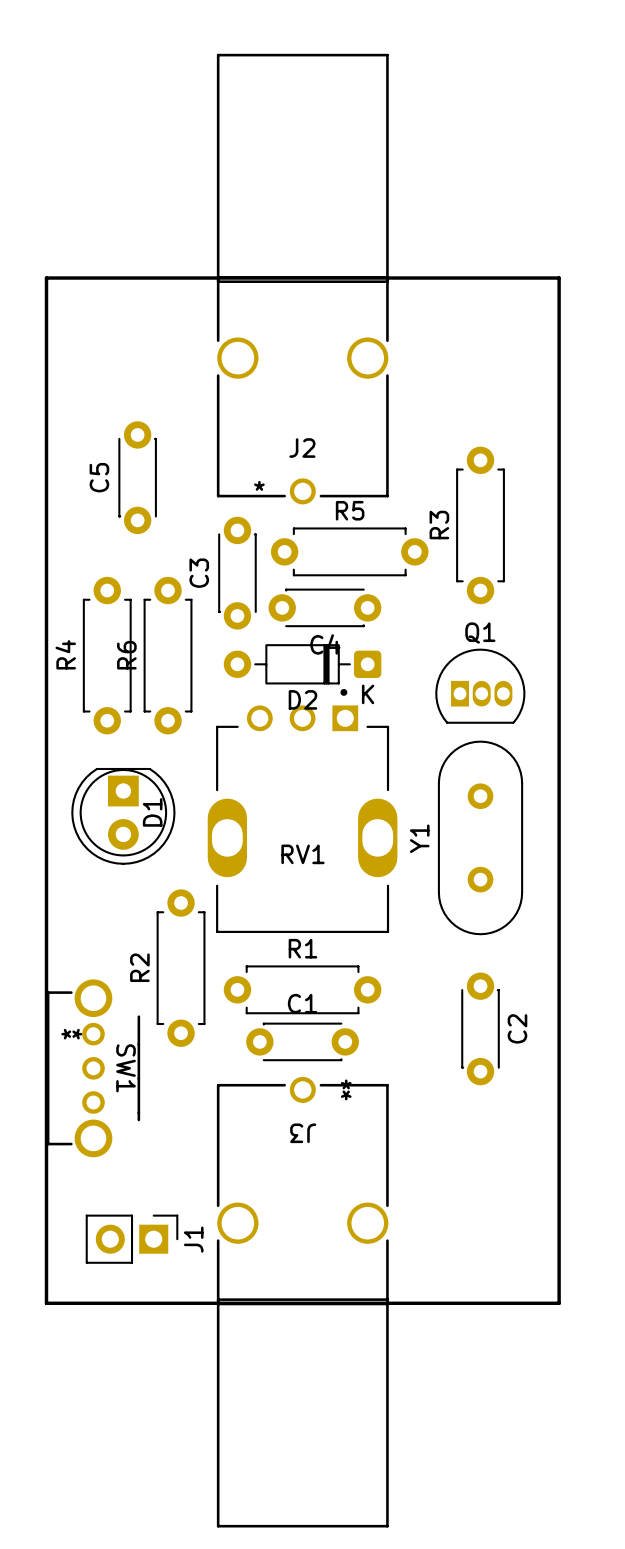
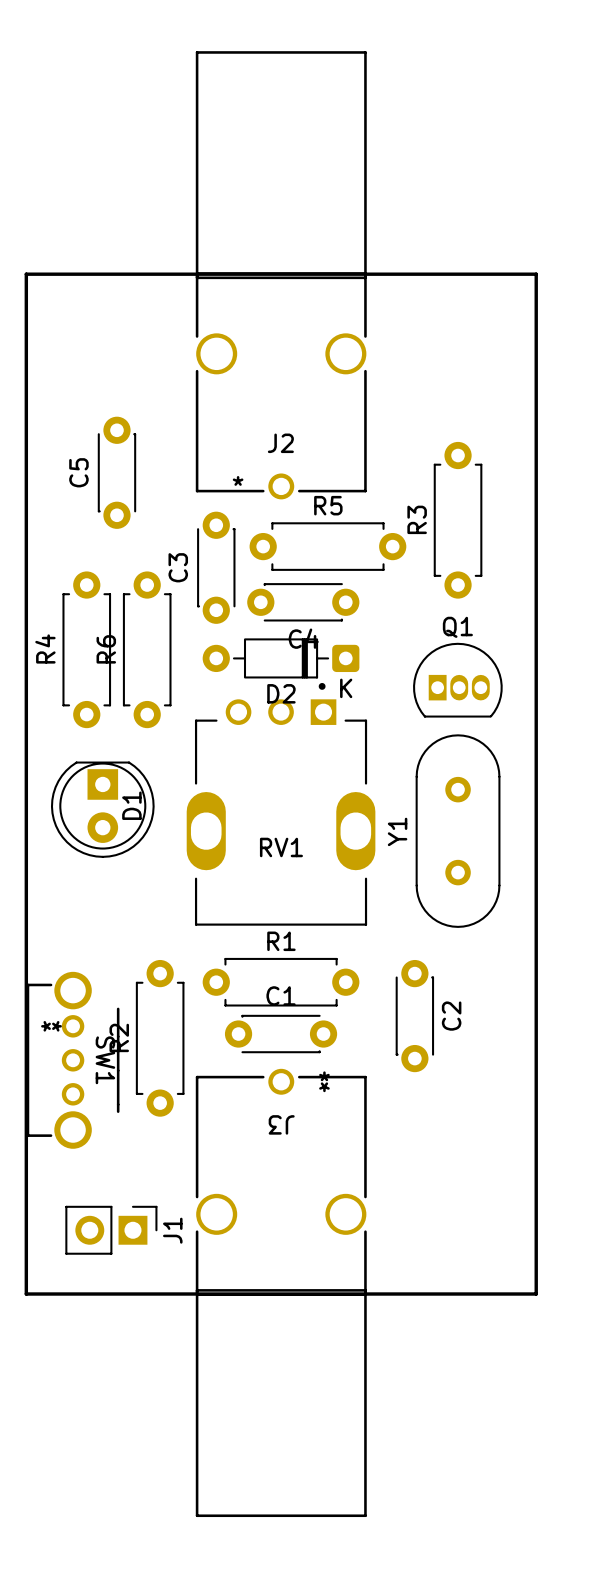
R2 position: (181, 968) -> (160, 1038)
C2 position: (480, 1028) -> (414, 1016)

